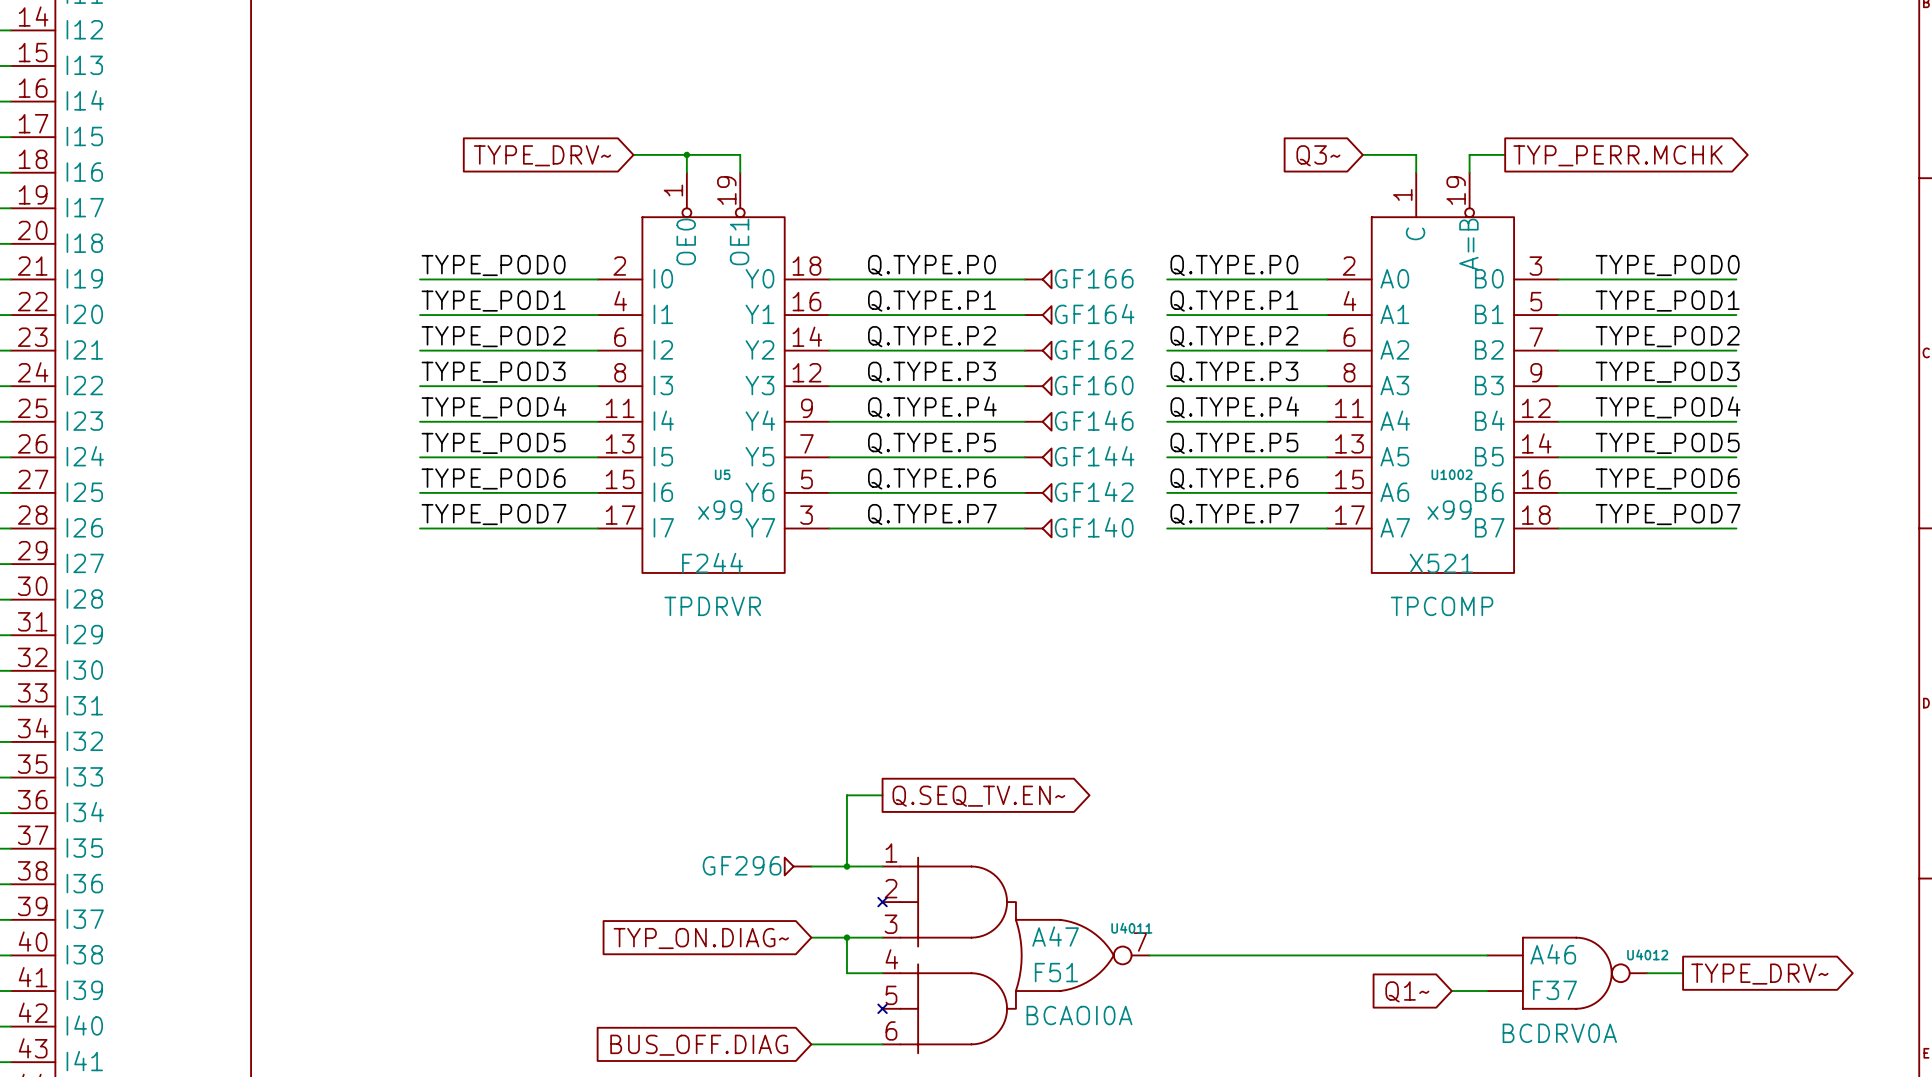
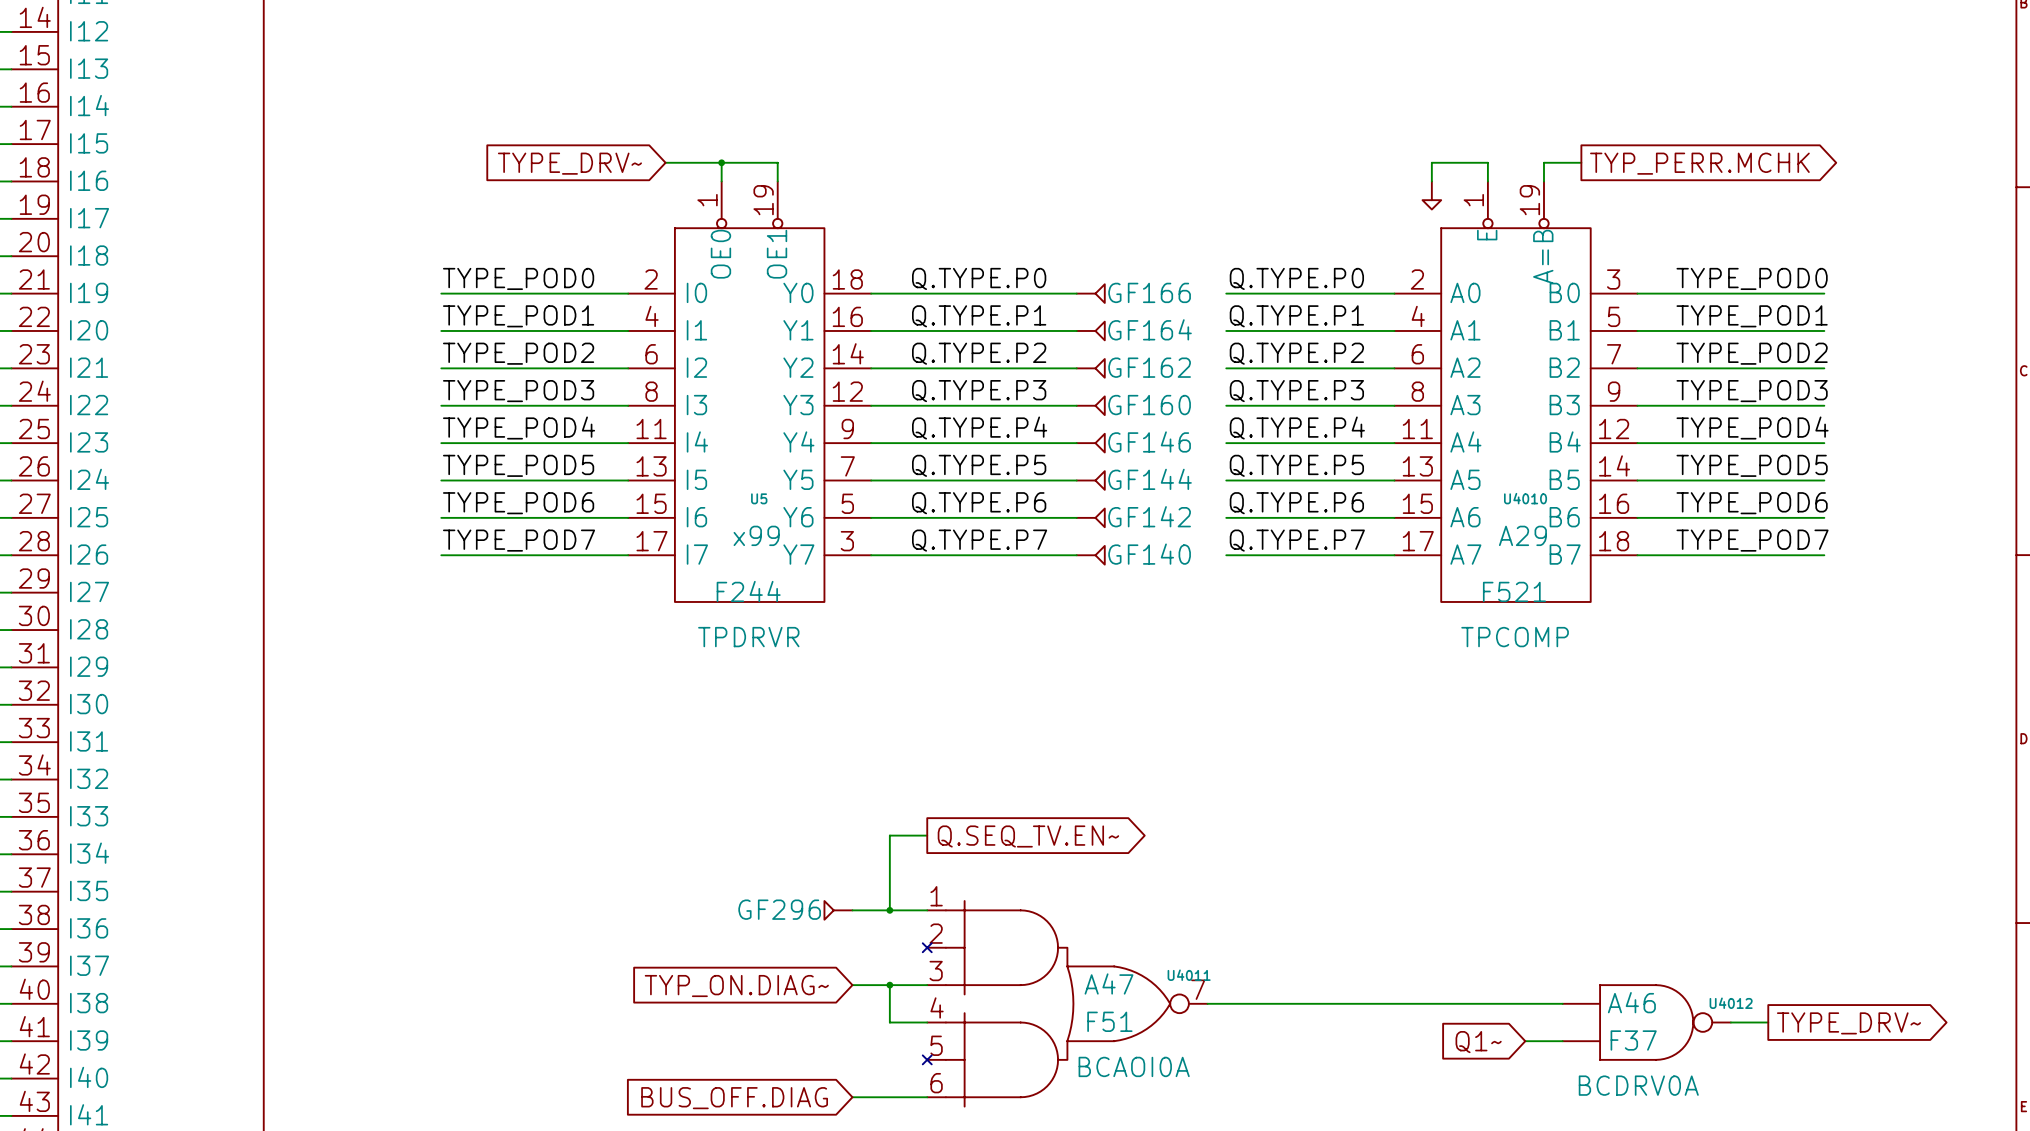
wire: none -> (1431, 162) (1431, 181)
global label: Q3~ (1318, 155) -> none
power symbol: none -> (1431, 195)
U1002: X521 (1442, 372) -> none
U4010: none -> F521 (1515, 391)

